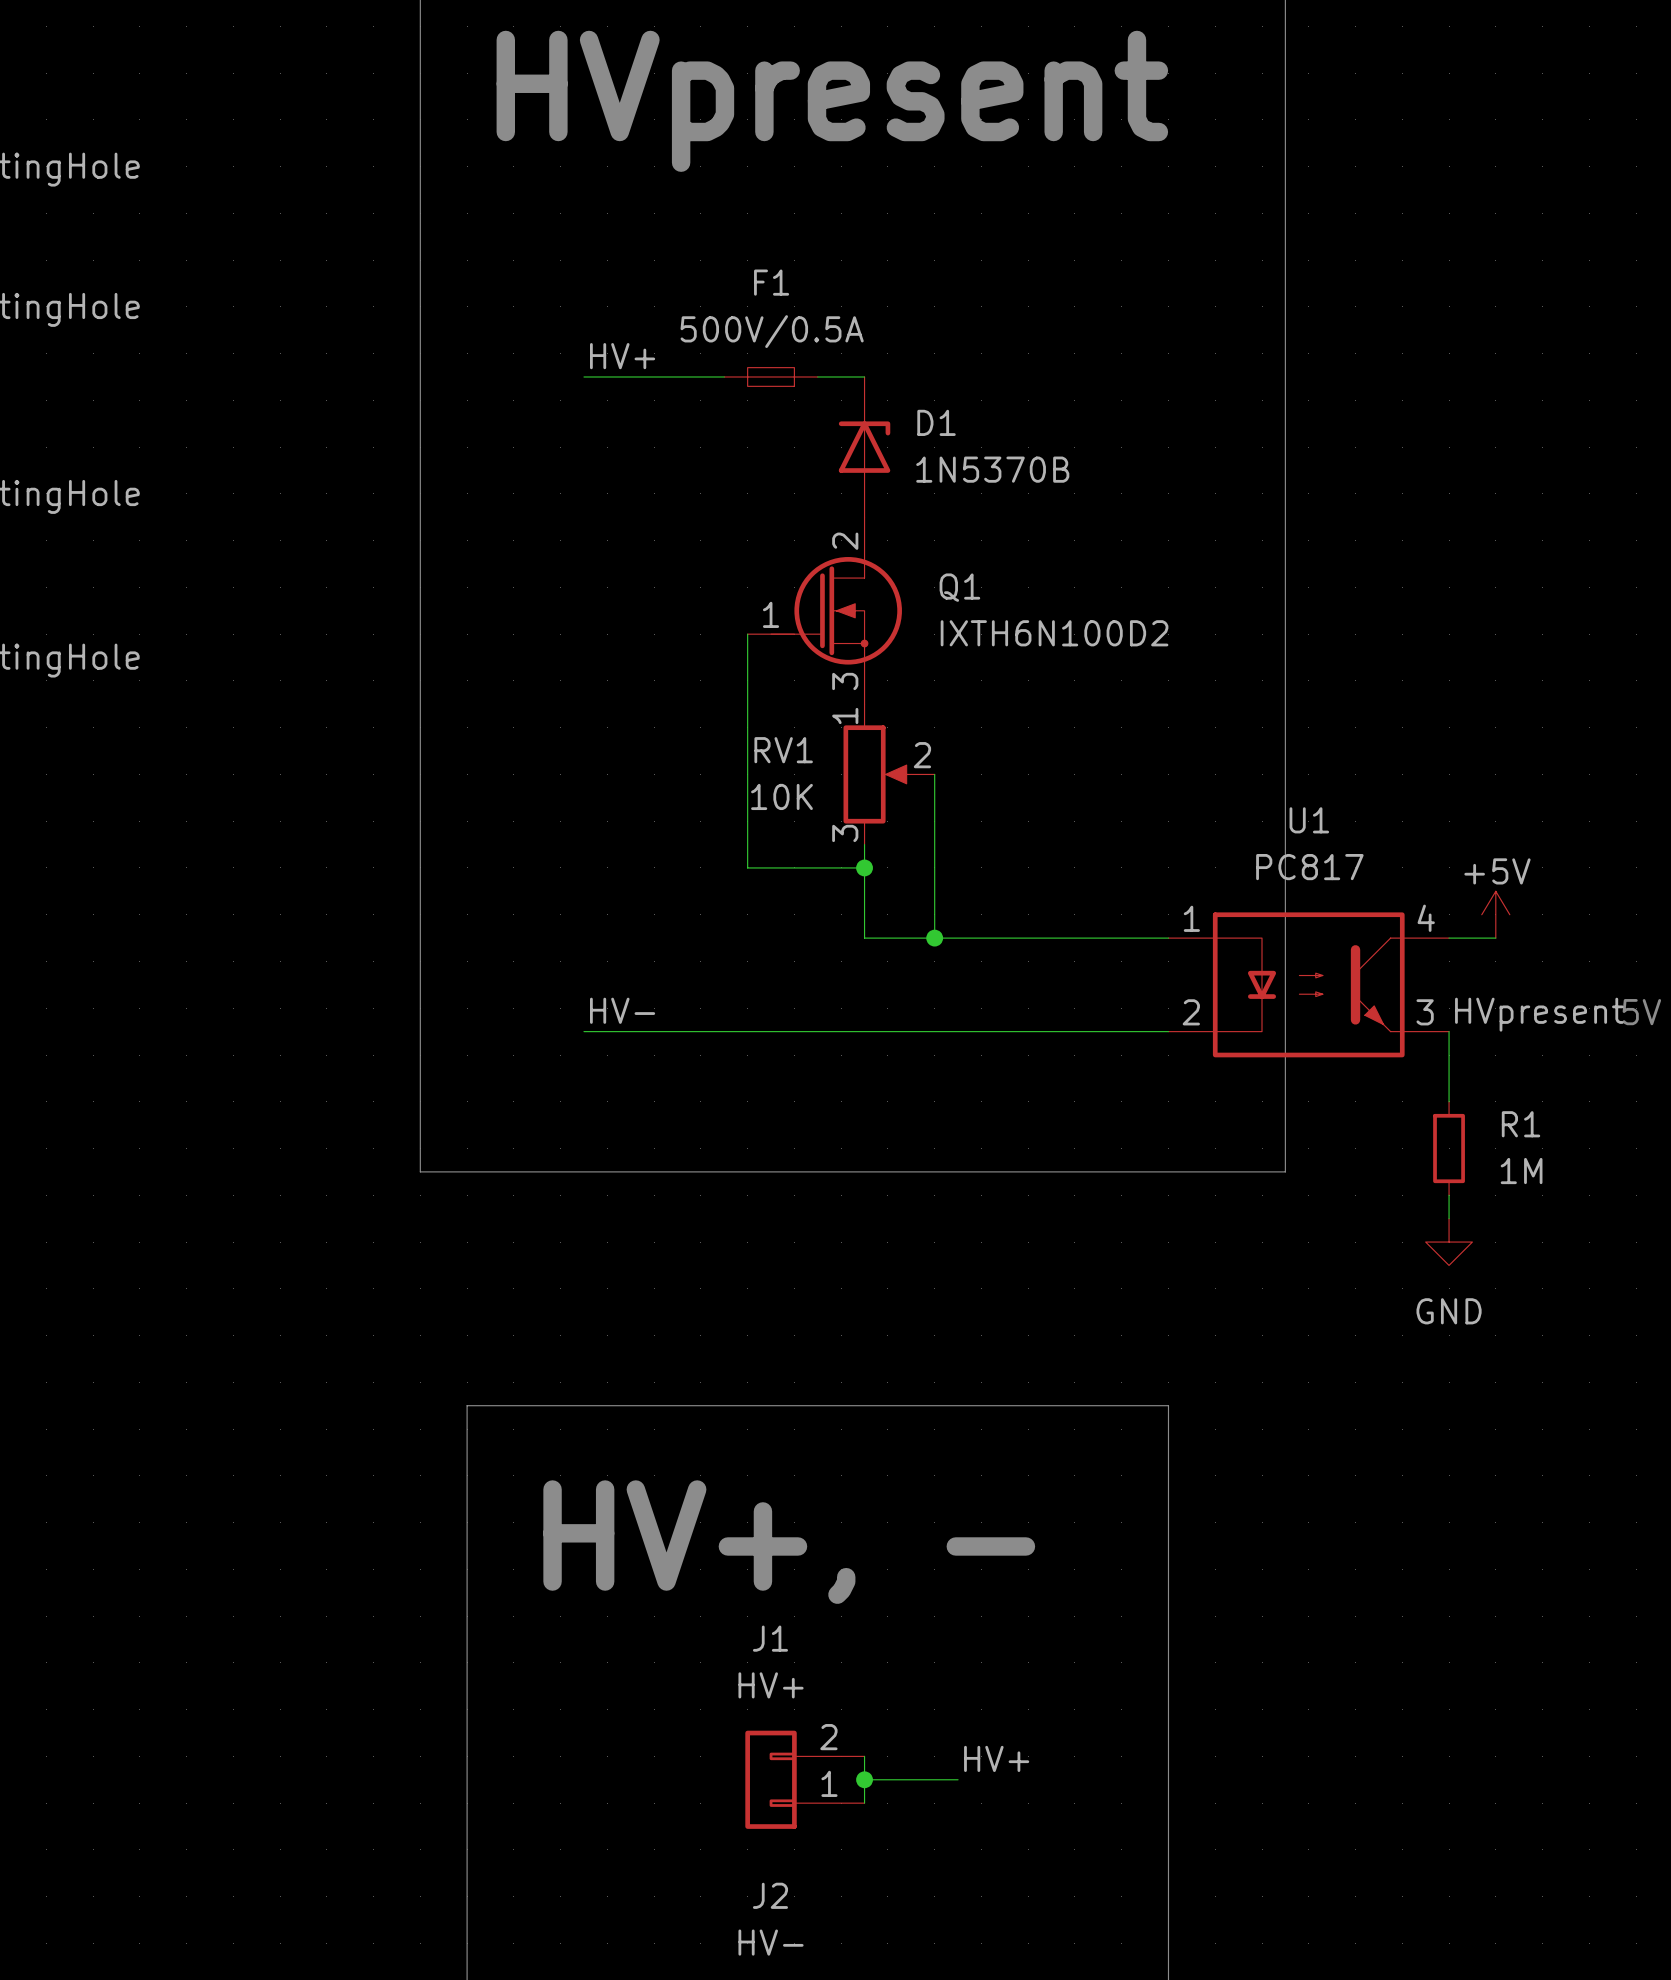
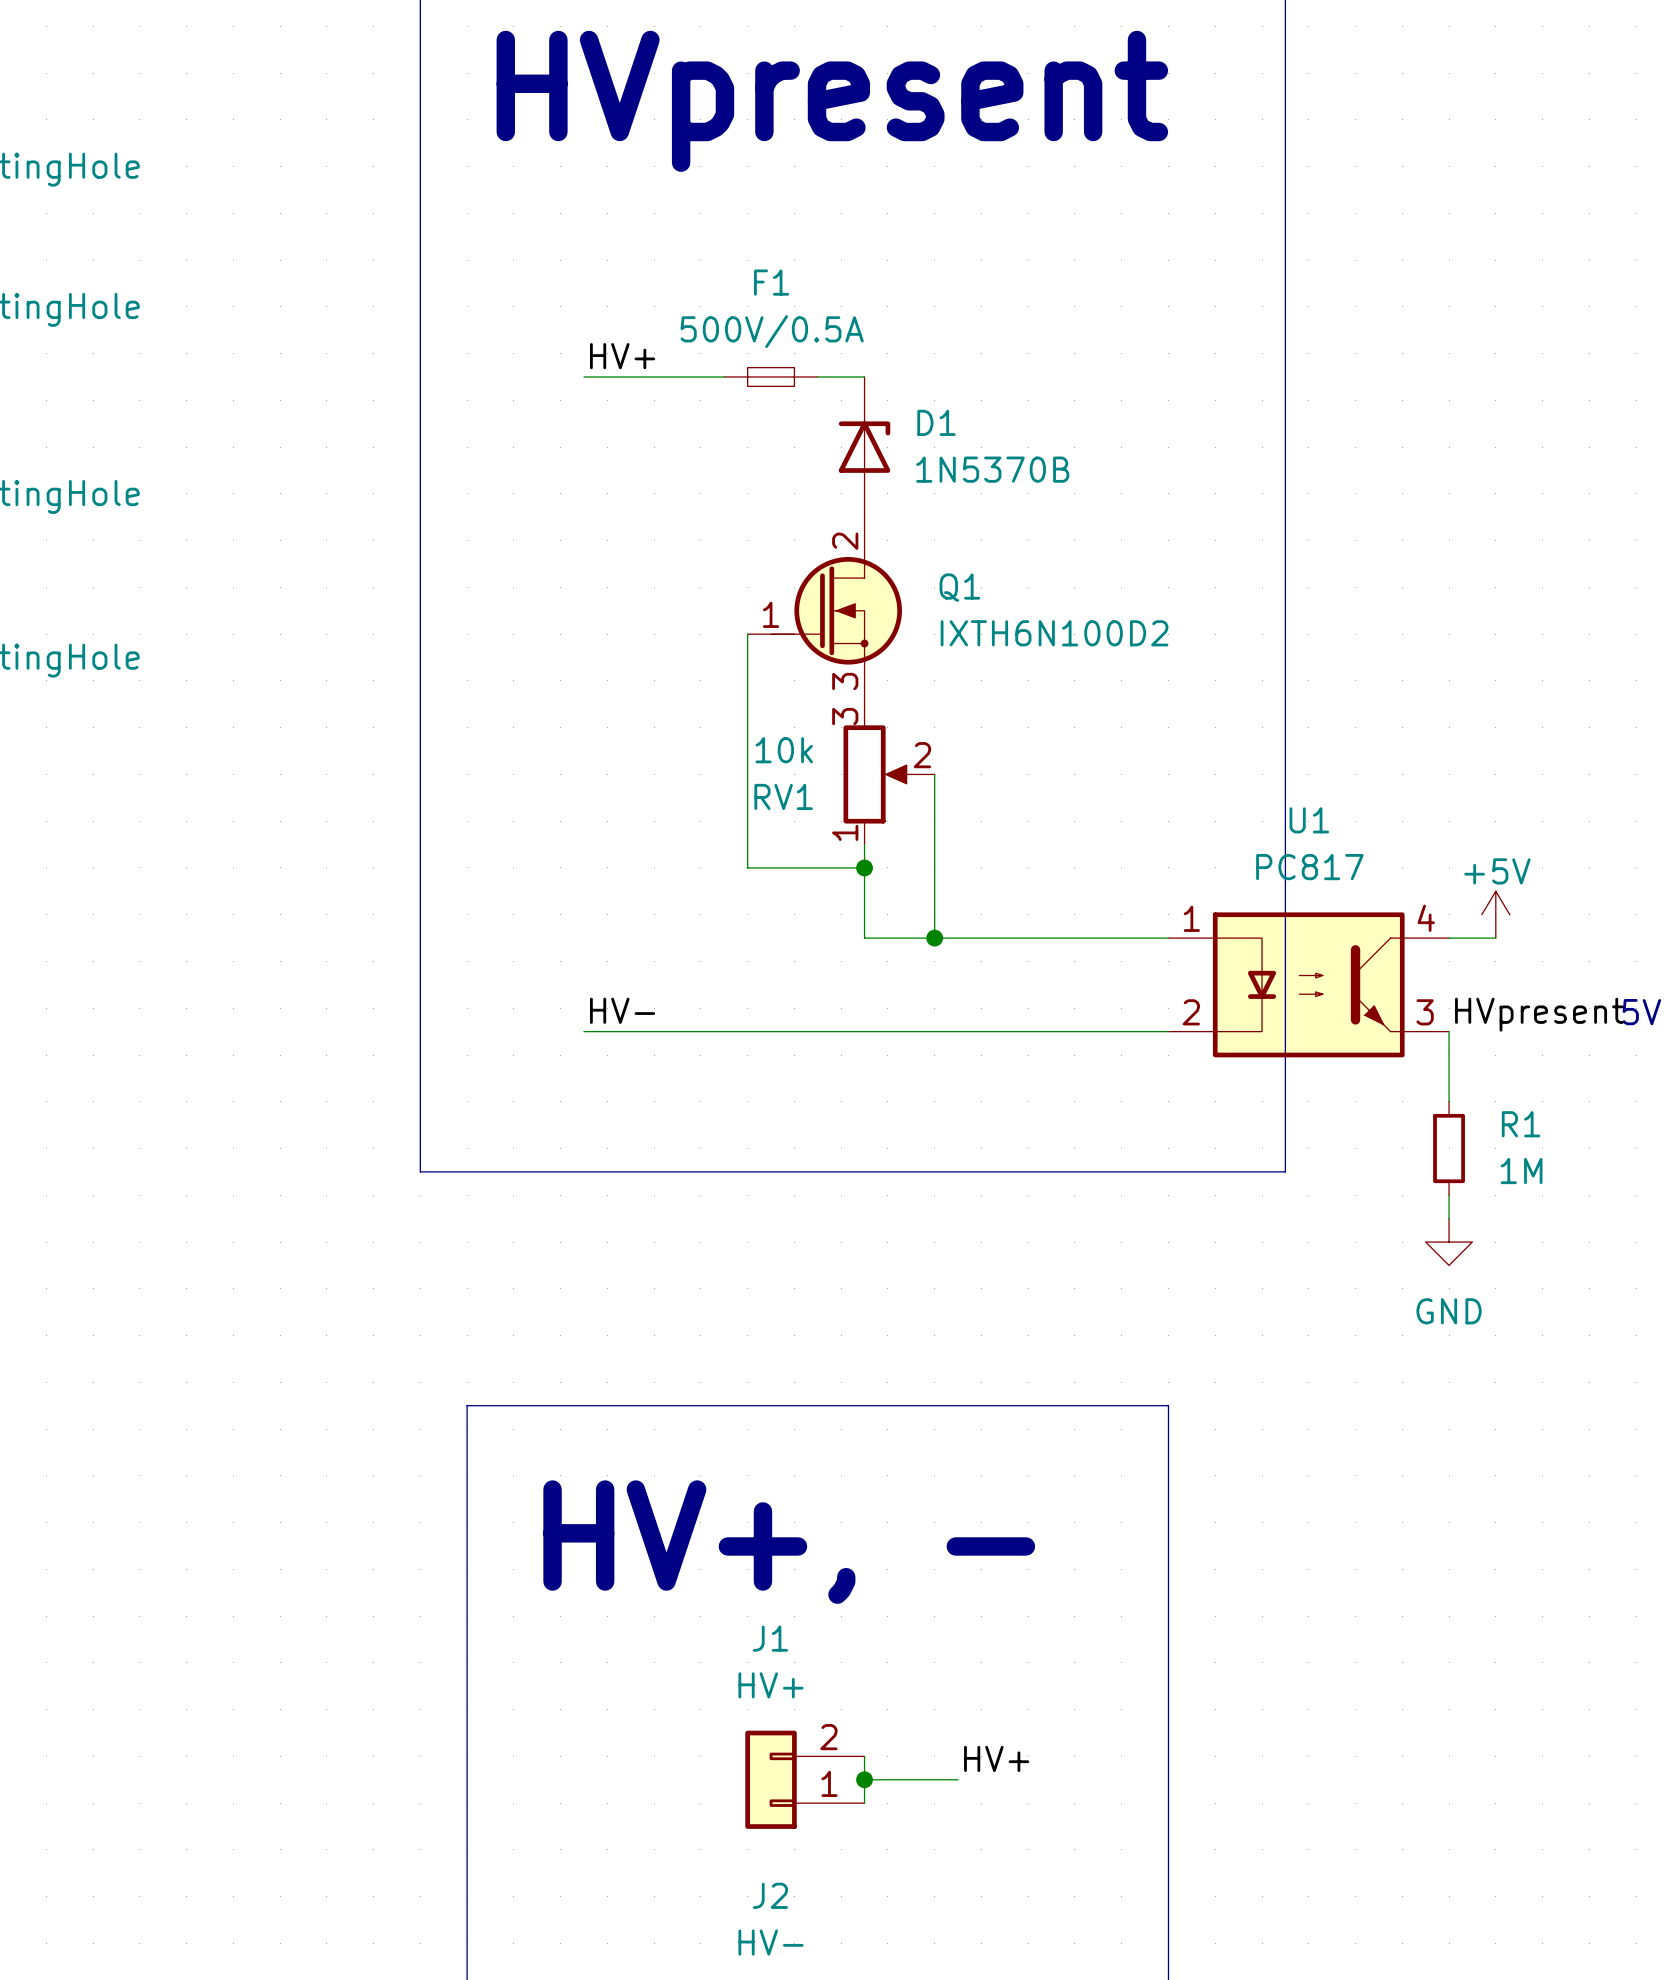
RV1 flip: as is (877, 774) -> up-down (877, 774)
RV1 value: 10K (781, 796) -> 10k (784, 750)

